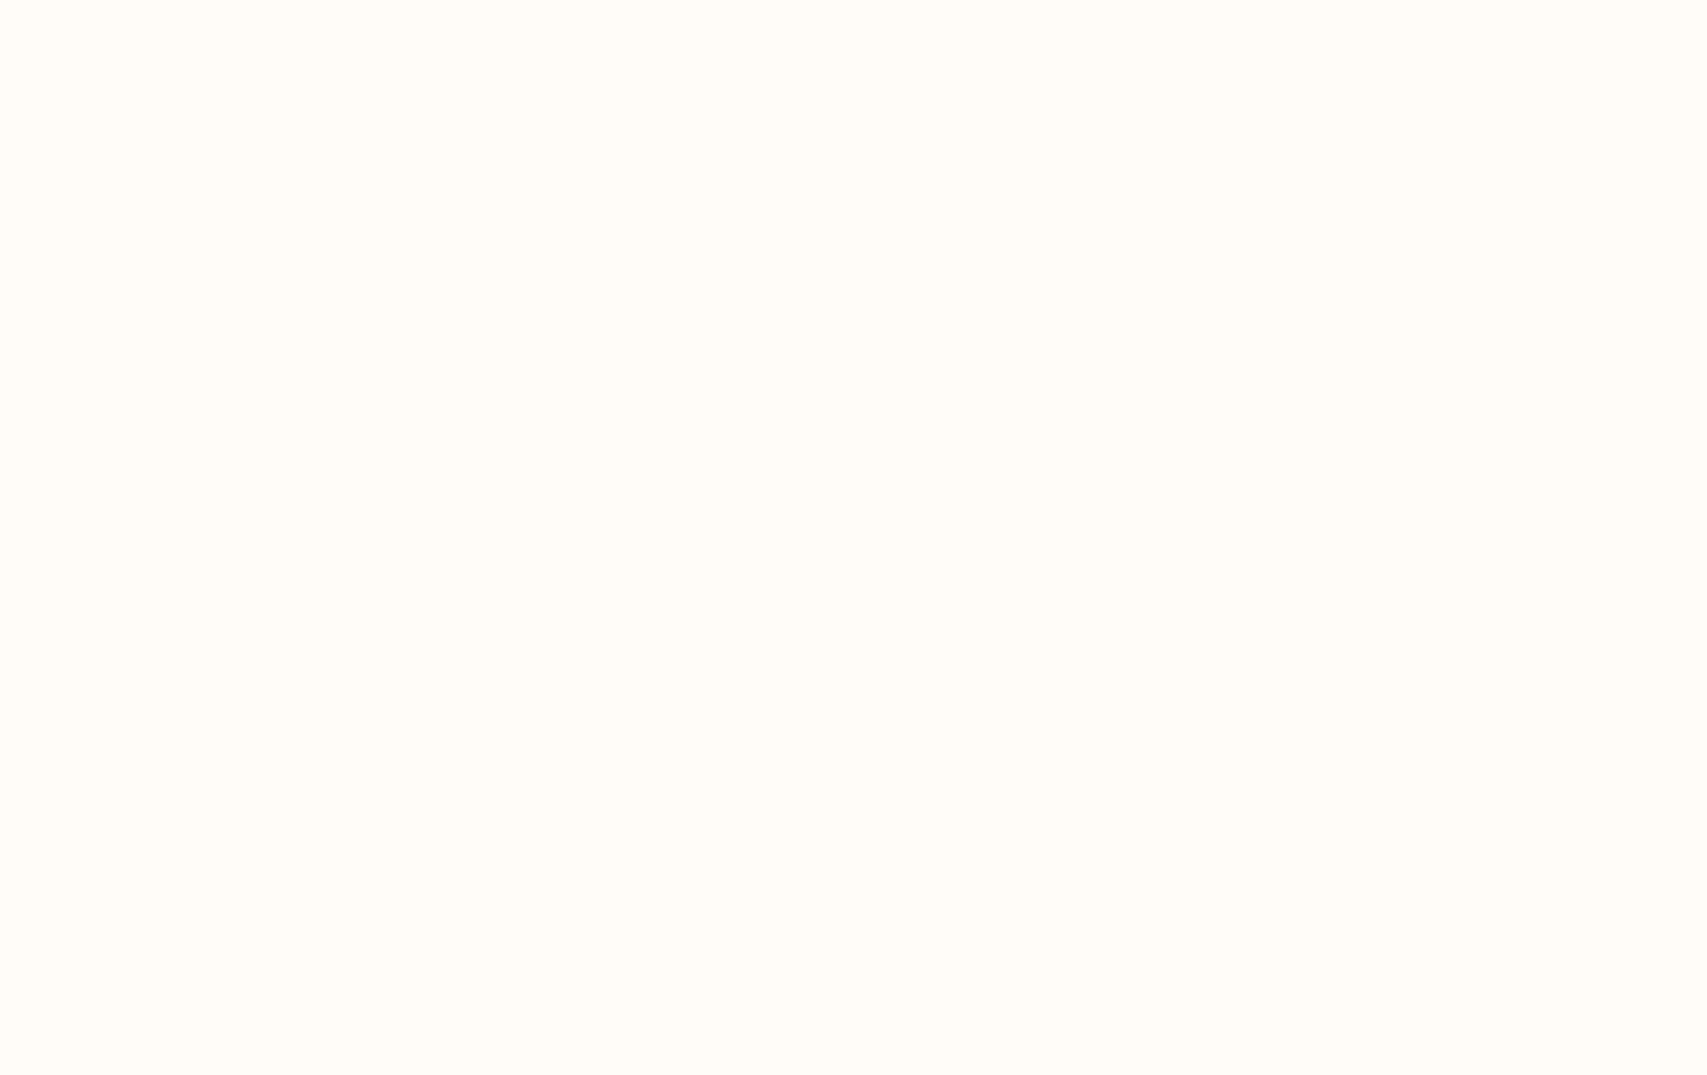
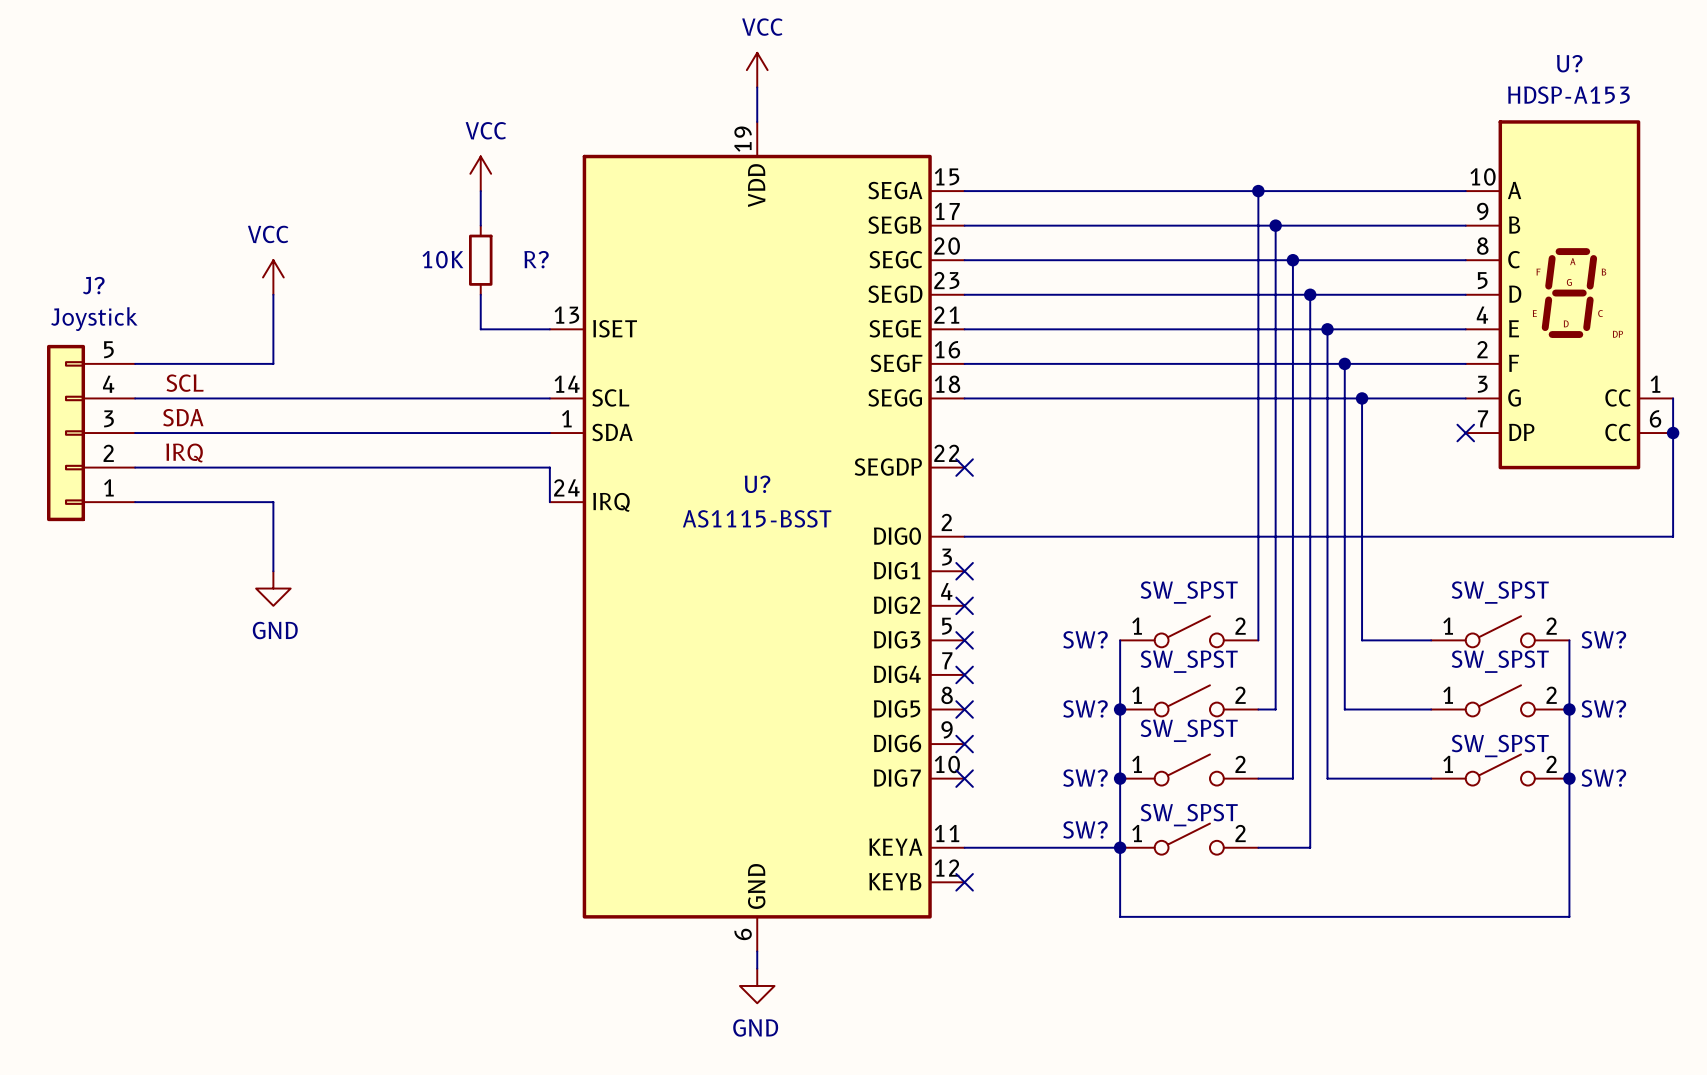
power symbol: none -> VCC (757, 70)
wire: none -> (757, 87) (757, 121)
power symbol: none -> VCC (480, 173)
wire: none -> (480, 191) (480, 225)
wire: none -> (964, 191) (1465, 191)
wire: none -> (1258, 191) (1258, 640)
junction: none -> (1258, 191)
wire: none -> (964, 225) (1465, 225)
wire: none -> (1275, 225) (1275, 709) (1258, 709)
junction: none -> (1275, 225)
R?: none -> 10K (480, 260)
wire: none -> (964, 260) (1465, 260)
wire: none -> (1292, 260) (1292, 778) (1258, 778)
junction: none -> (1292, 260)
power symbol: none -> VCC (273, 277)
wire: none -> (273, 294) (273, 363) (135, 363)
wire: none -> (480, 294) (480, 329) (549, 329)
wire: none -> (964, 294) (1465, 294)
wire: none -> (1310, 294) (1310, 847) (1258, 847)
junction: none -> (1310, 294)
U?: none -> HDSP-A153 (1569, 294)
wire: none -> (964, 329) (1465, 329)
wire: none -> (1327, 329) (1327, 778) (1431, 778)
junction: none -> (1327, 329)
wire: none -> (964, 363) (1465, 363)
wire: none -> (1344, 363) (1344, 709) (1431, 709)
junction: none -> (1344, 363)
label: none -> SCL (185, 383)
wire: none -> (135, 398) (549, 398)
wire: none -> (964, 398) (1465, 398)
wire: none -> (1362, 398) (1362, 640) (1431, 640)
junction: none -> (1362, 398)
wire: none -> (1673, 398) (1673, 536) (964, 536)
label: none -> SDA (183, 417)
J?: none -> Joystick (91, 433)
wire: none -> (135, 433) (549, 433)
no-connect mark: none -> (1465, 433)
junction: none -> (1673, 433)
label: none -> IRQ (184, 452)
wire: none -> (135, 467) (549, 467) (549, 502)
no-connect mark: none -> (964, 467)
wire: none -> (135, 502) (273, 502) (273, 571)
U?: none -> AS1115-BSST (757, 536)
no-connect mark: none -> (964, 571)
power symbol: none -> GND (273, 588)
no-connect mark: none -> (964, 605)
SW?: none -> SW_SPST (1189, 631)
SW?: none -> SW_SPST (1500, 631)
no-connect mark: none -> (964, 640)
wire: none -> (1120, 640) (1120, 916) (1569, 916) (1569, 640)
no-connect mark: none -> (964, 674)
SW?: none -> SW_SPST (1189, 700)
SW?: none -> SW_SPST (1500, 700)
no-connect mark: none -> (964, 709)
junction: none -> (1120, 709)
junction: none -> (1569, 709)
no-connect mark: none -> (964, 744)
SW?: none -> SW_SPST (1189, 769)
SW?: none -> SW_SPST (1500, 769)
no-connect mark: none -> (964, 778)
junction: none -> (1120, 778)
junction: none -> (1569, 778)
SW?: none -> SW_SPST (1189, 839)
wire: none -> (964, 847) (1120, 847)
junction: none -> (1120, 847)
no-connect mark: none -> (964, 882)
wire: none -> (757, 951) (757, 968)
power symbol: none -> GND (757, 985)

